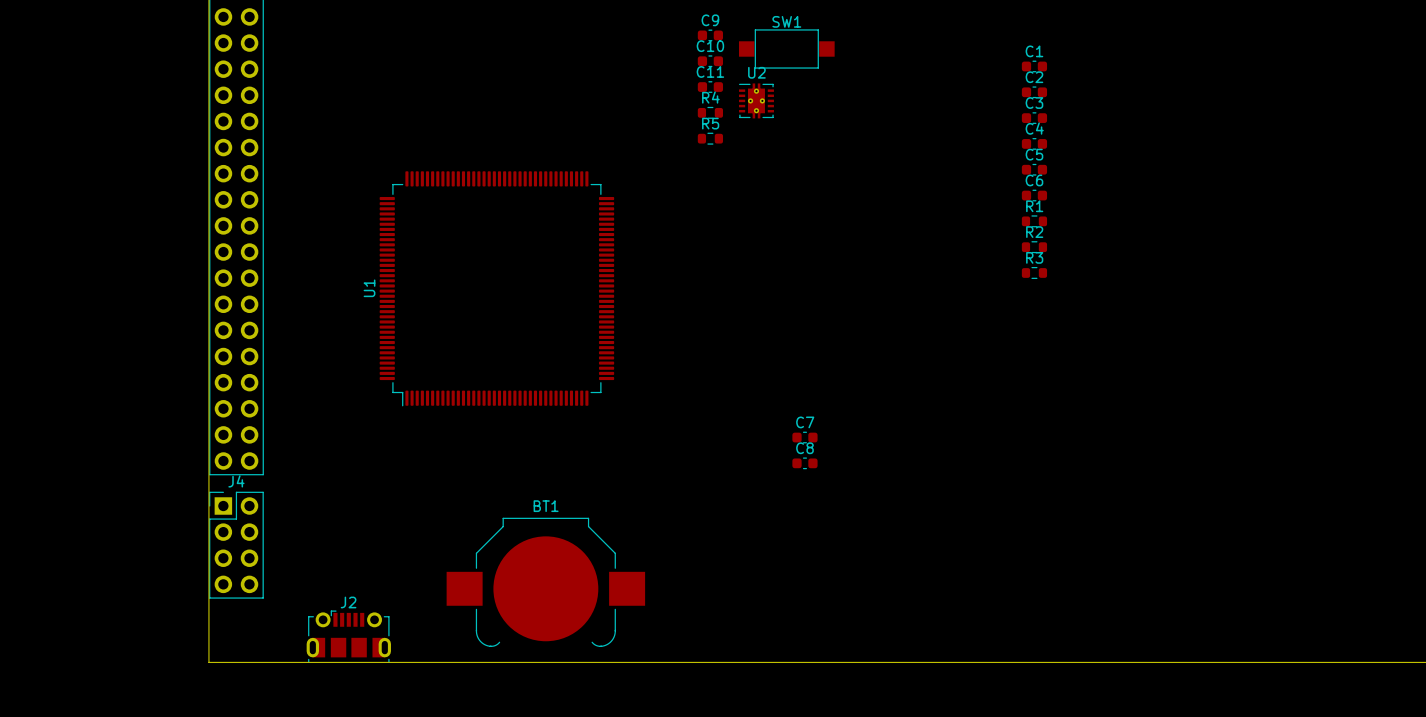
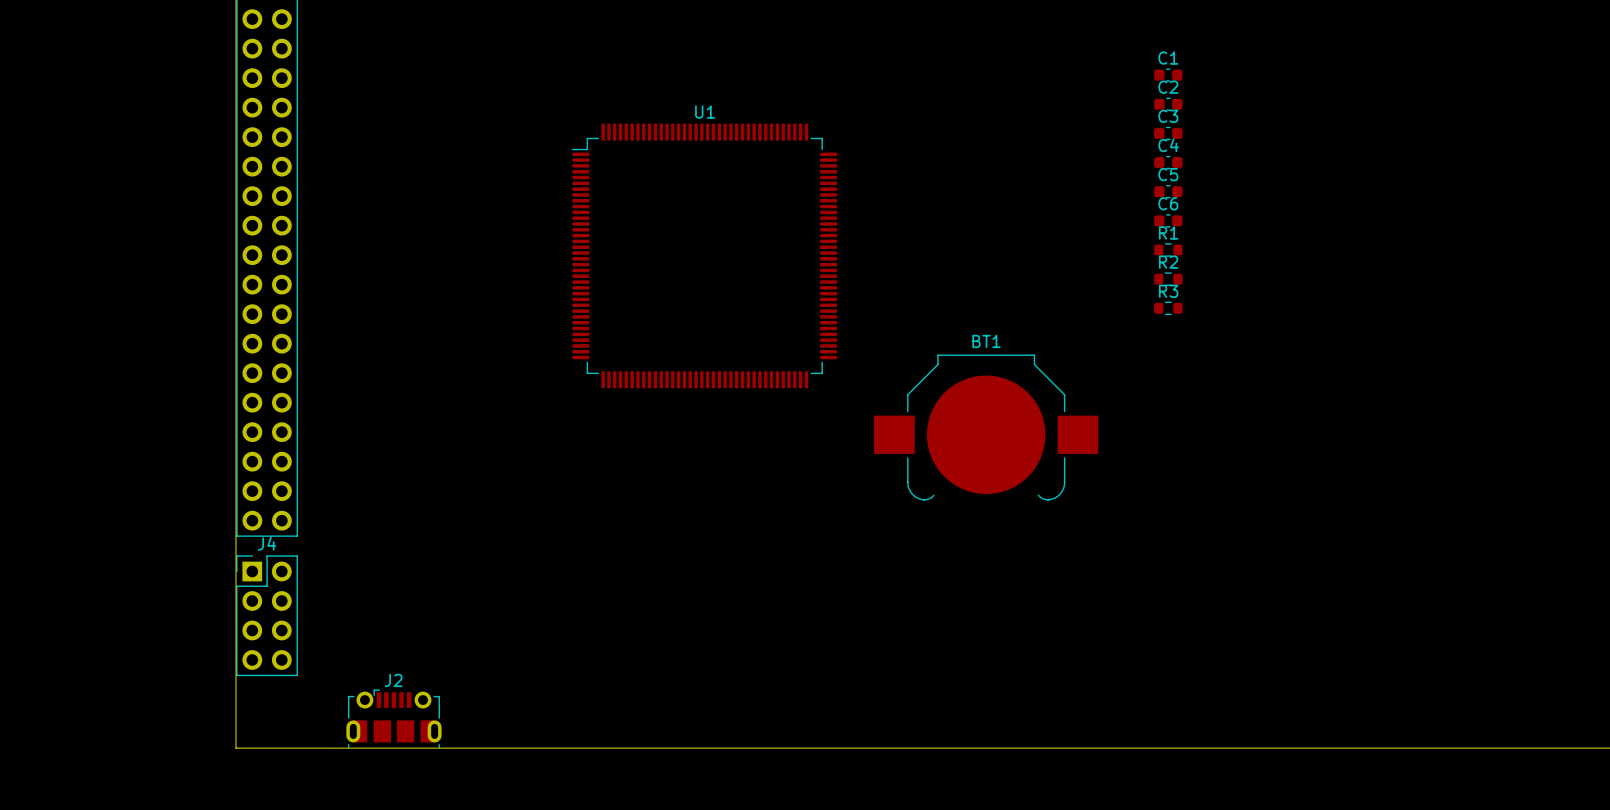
C9: (710, 35) -> none
SW1: (786, 48) -> none
C10: (710, 61) -> none
C11: (710, 87) -> none
U2: (756, 100) -> none
R4: (710, 112) -> none
R5: (710, 138) -> none
U1 rotation: 0° (496, 288) -> 90° clockwise (704, 255)
U1 position: (496, 288) -> (704, 255)
C7: (804, 437) -> none
C8: (804, 463) -> none
BT1 position: (545, 582) -> (986, 427)

